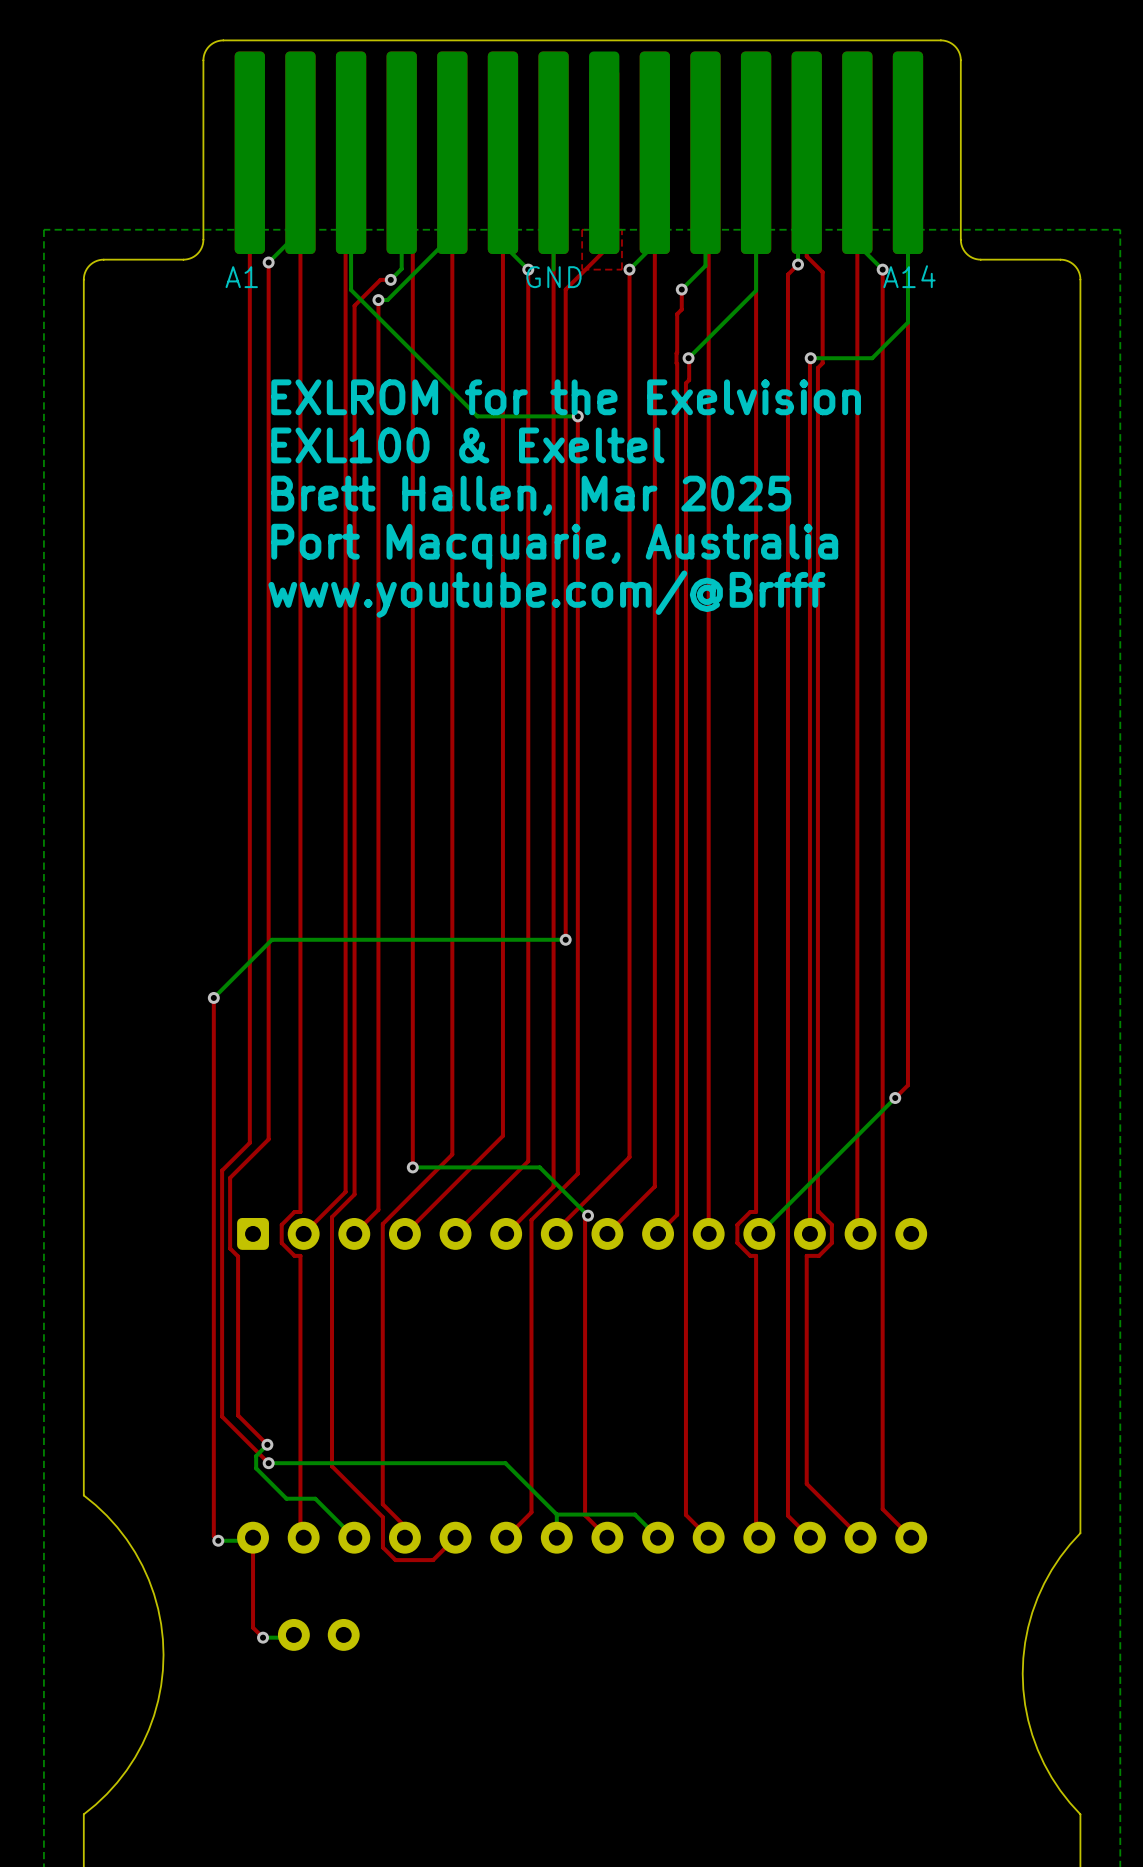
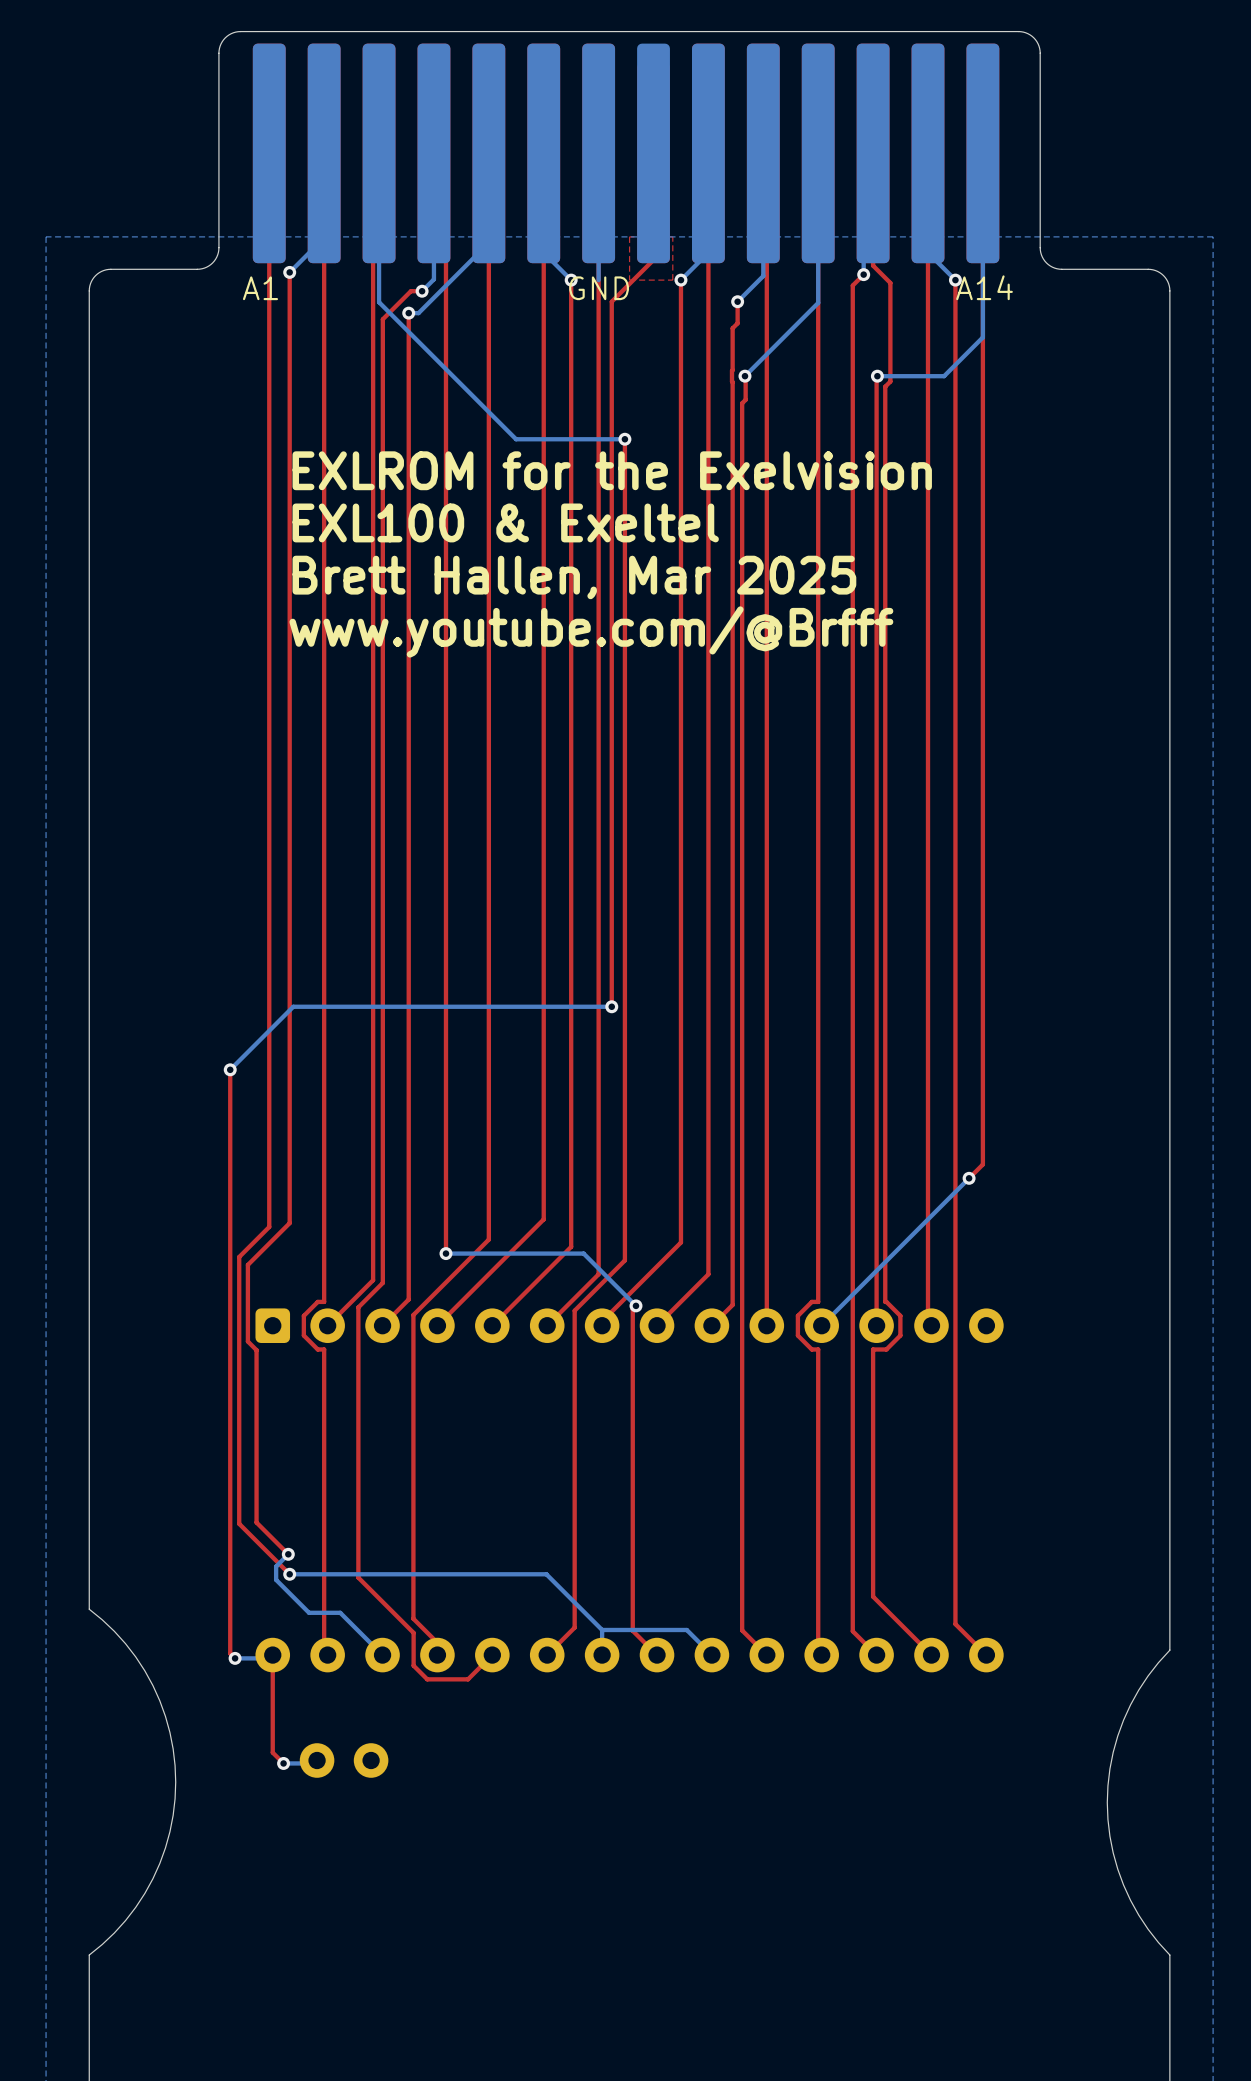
text: EXLROM for the Exelvision (566, 397) -> none
text: EXL100 & Exeltel (467, 445) -> EXLROM for the Exelvision (612, 470)
text: Brett Hallen, Mar 2025 (531, 495) -> EXL100 & Exeltel (505, 522)
text: Port Macquarie, Australia (554, 546) -> Brett Hallen, Mar 2025 (574, 577)

